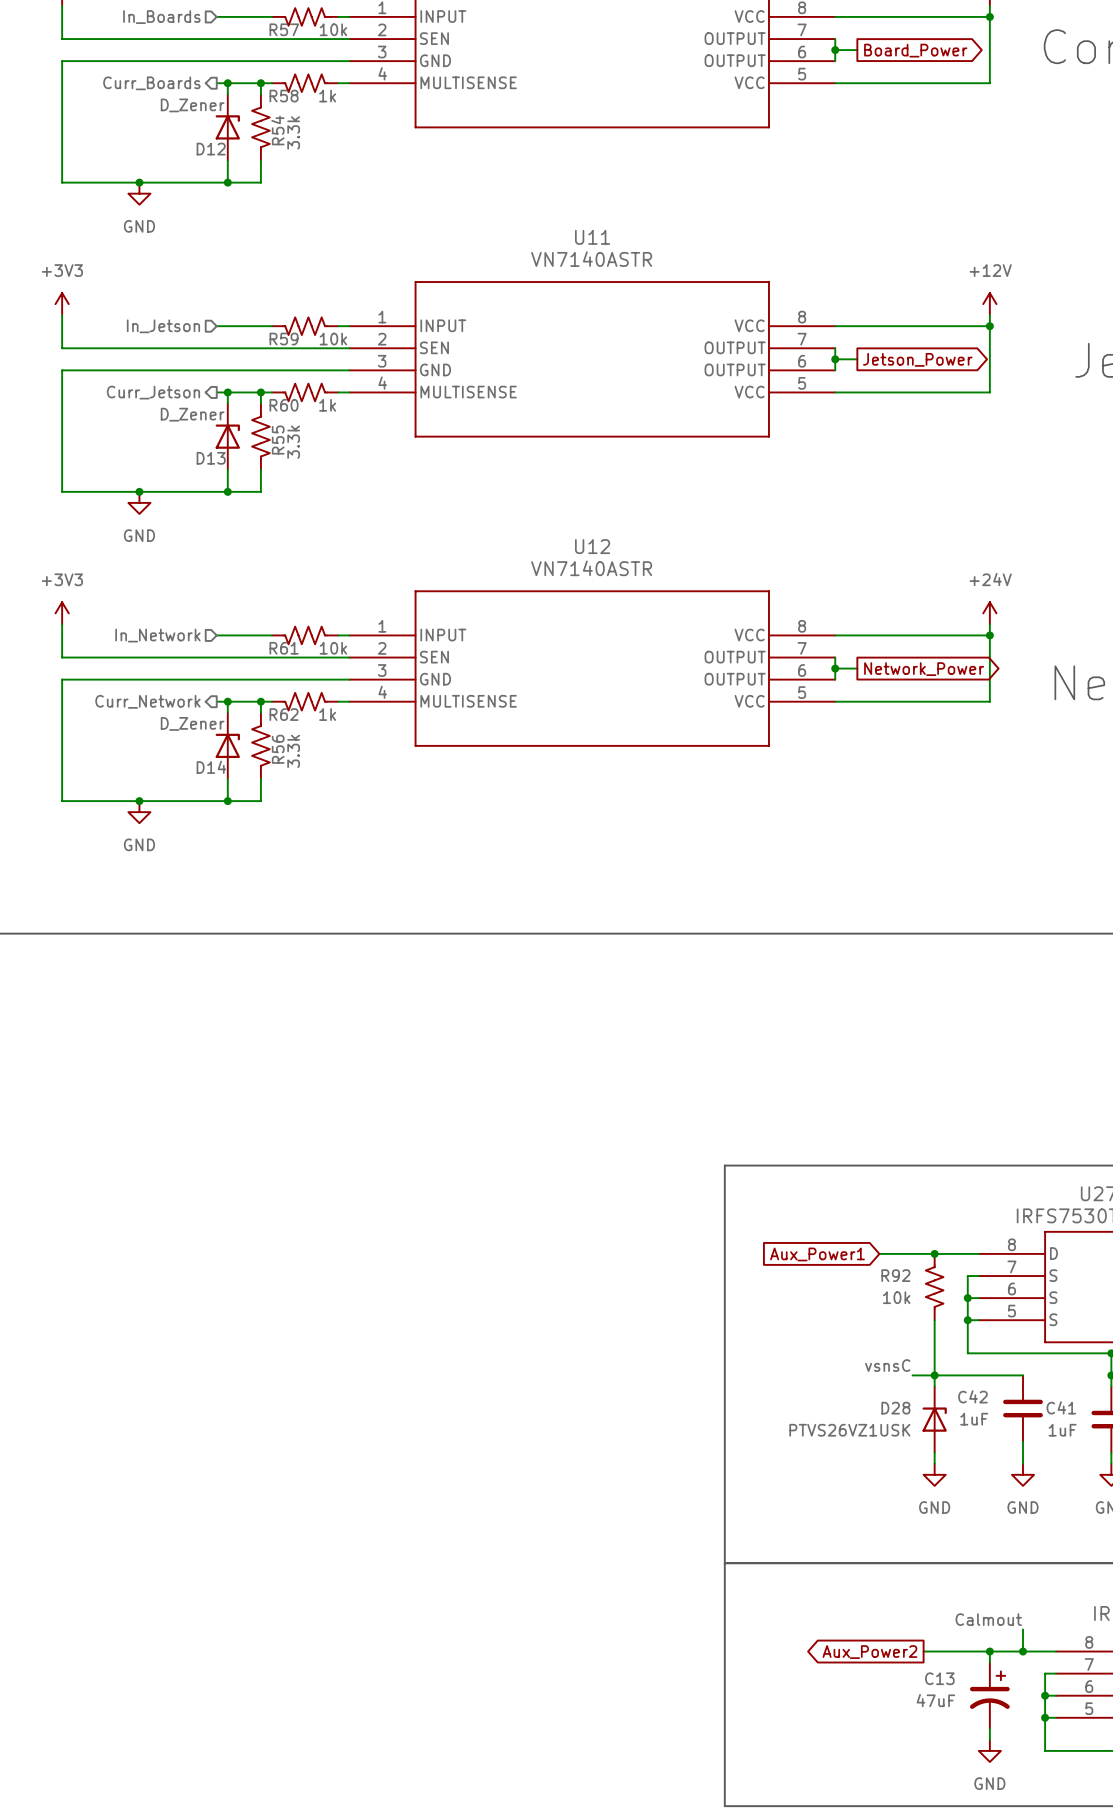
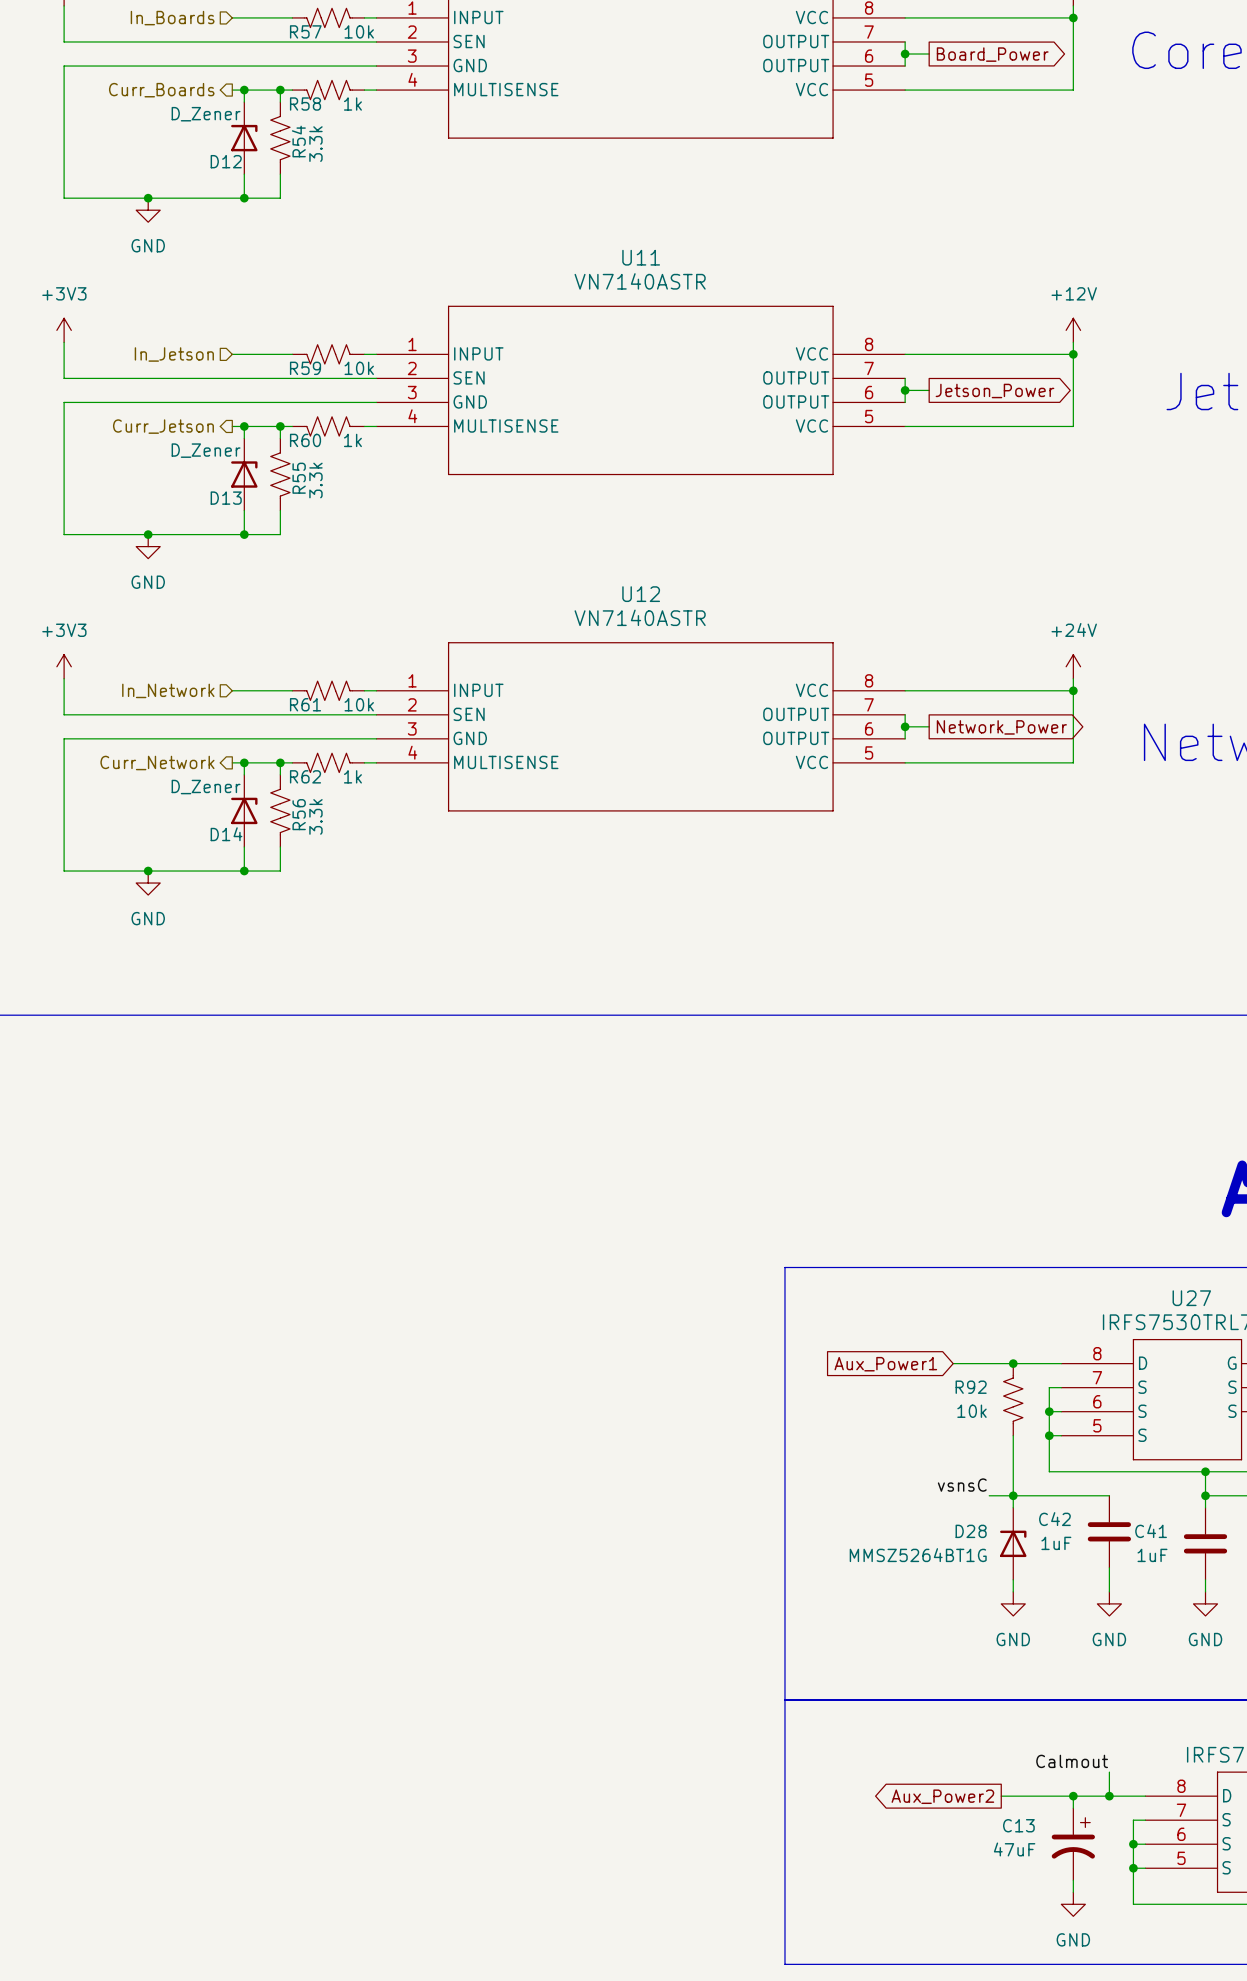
D28 value: PTVS26VZ1USK (849, 1430) -> MMSZ5264BT1G (918, 1555)

